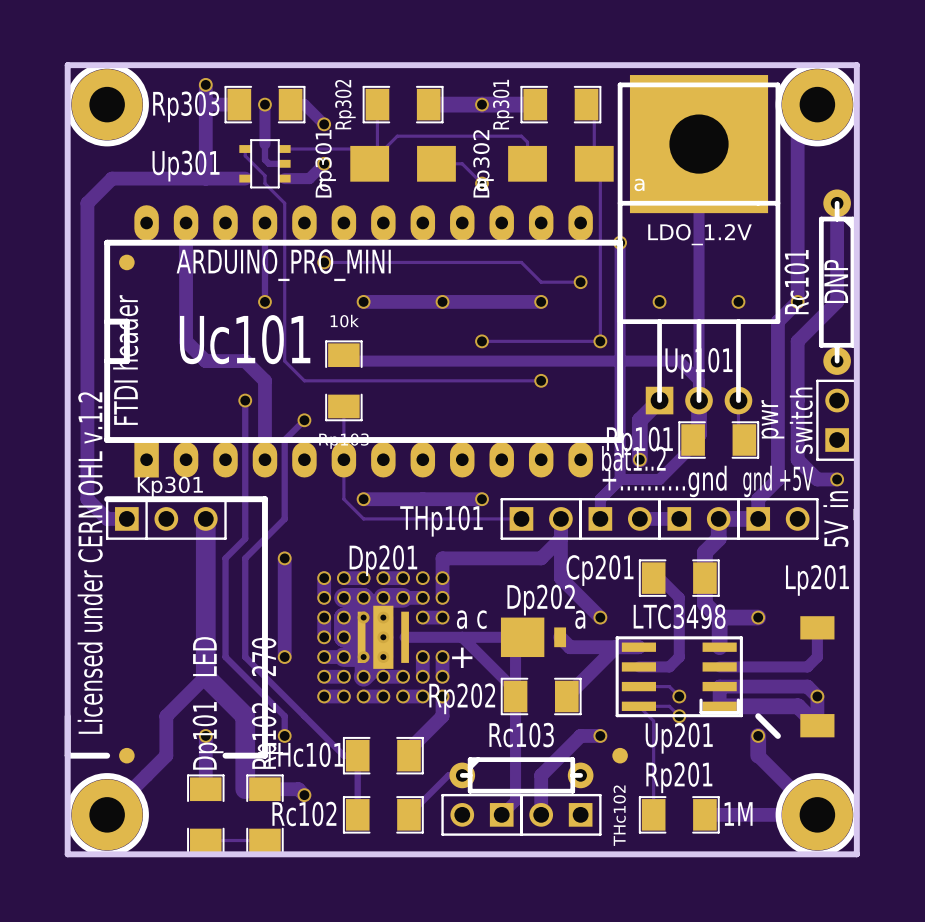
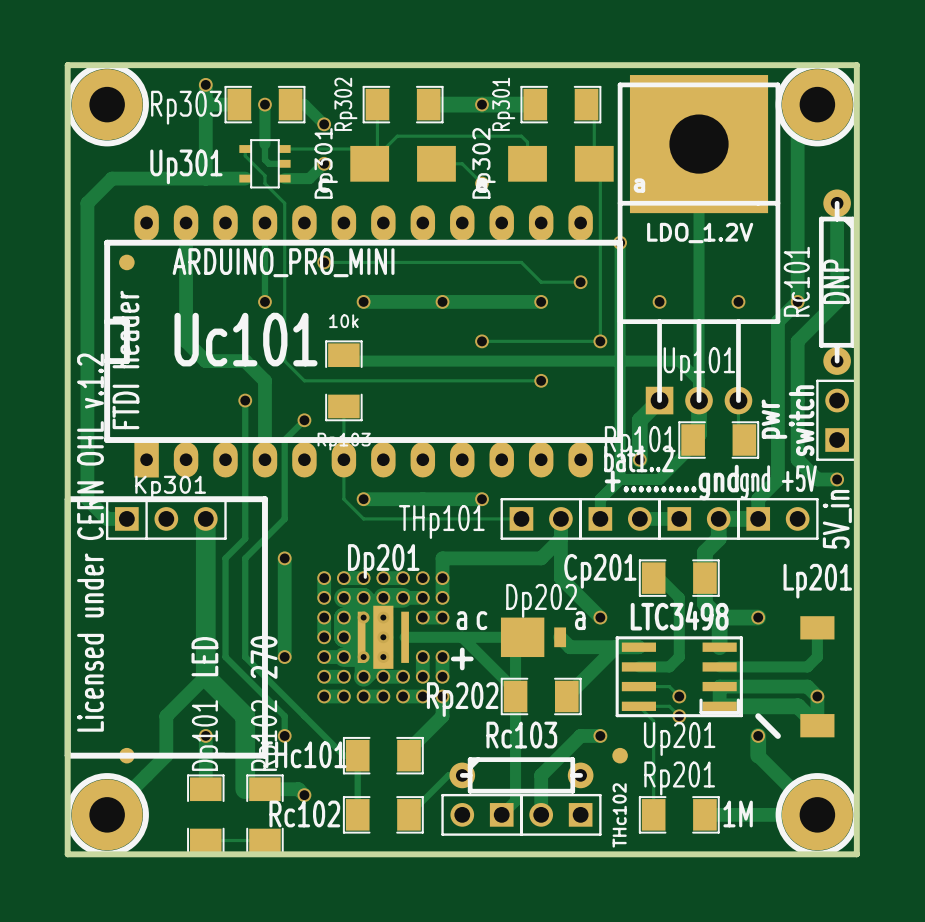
Kp301 footprint: [64, 496, 268, 759] -> [64, 496, 268, 759]

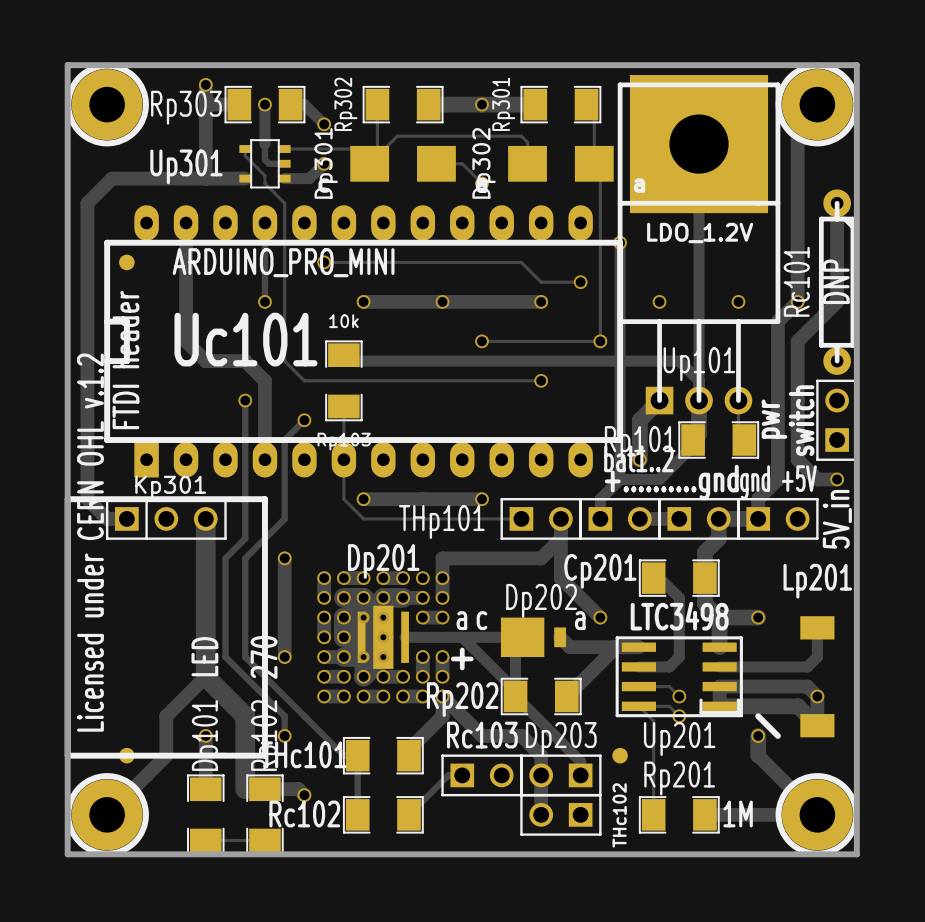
track: (515, 696) (515, 801) (501, 814) -> (515, 696) (580, 761) (580, 775)
track: (600, 735) (580, 735) (541, 775) -> (442, 696) (481, 735) (521, 735) (541, 755) (541, 775)
via: (600, 735) -> none
Rc103 footprint: [449, 757, 594, 794] -> [441, 754, 523, 797]
Dp203: none -> (560, 775)
part: (481, 814) -> none

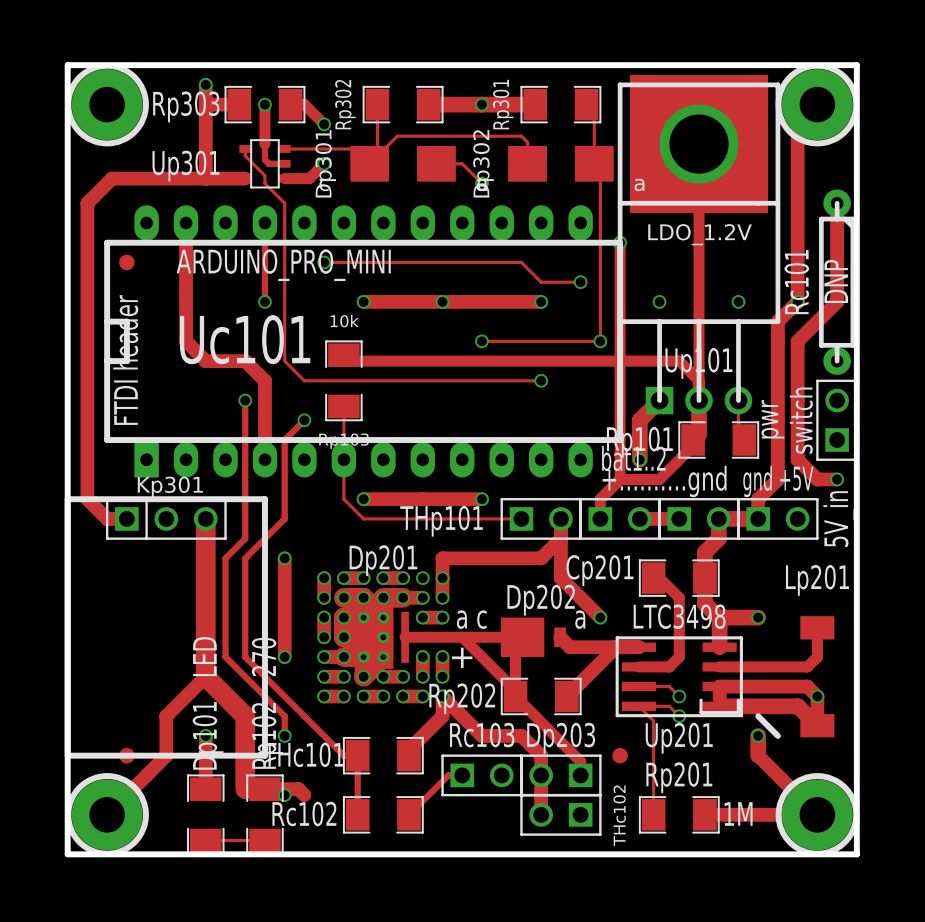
text: Licensed under CERN OHL v.1.2 (90, 542) -> none
via position: (304, 795) -> (284, 795)

